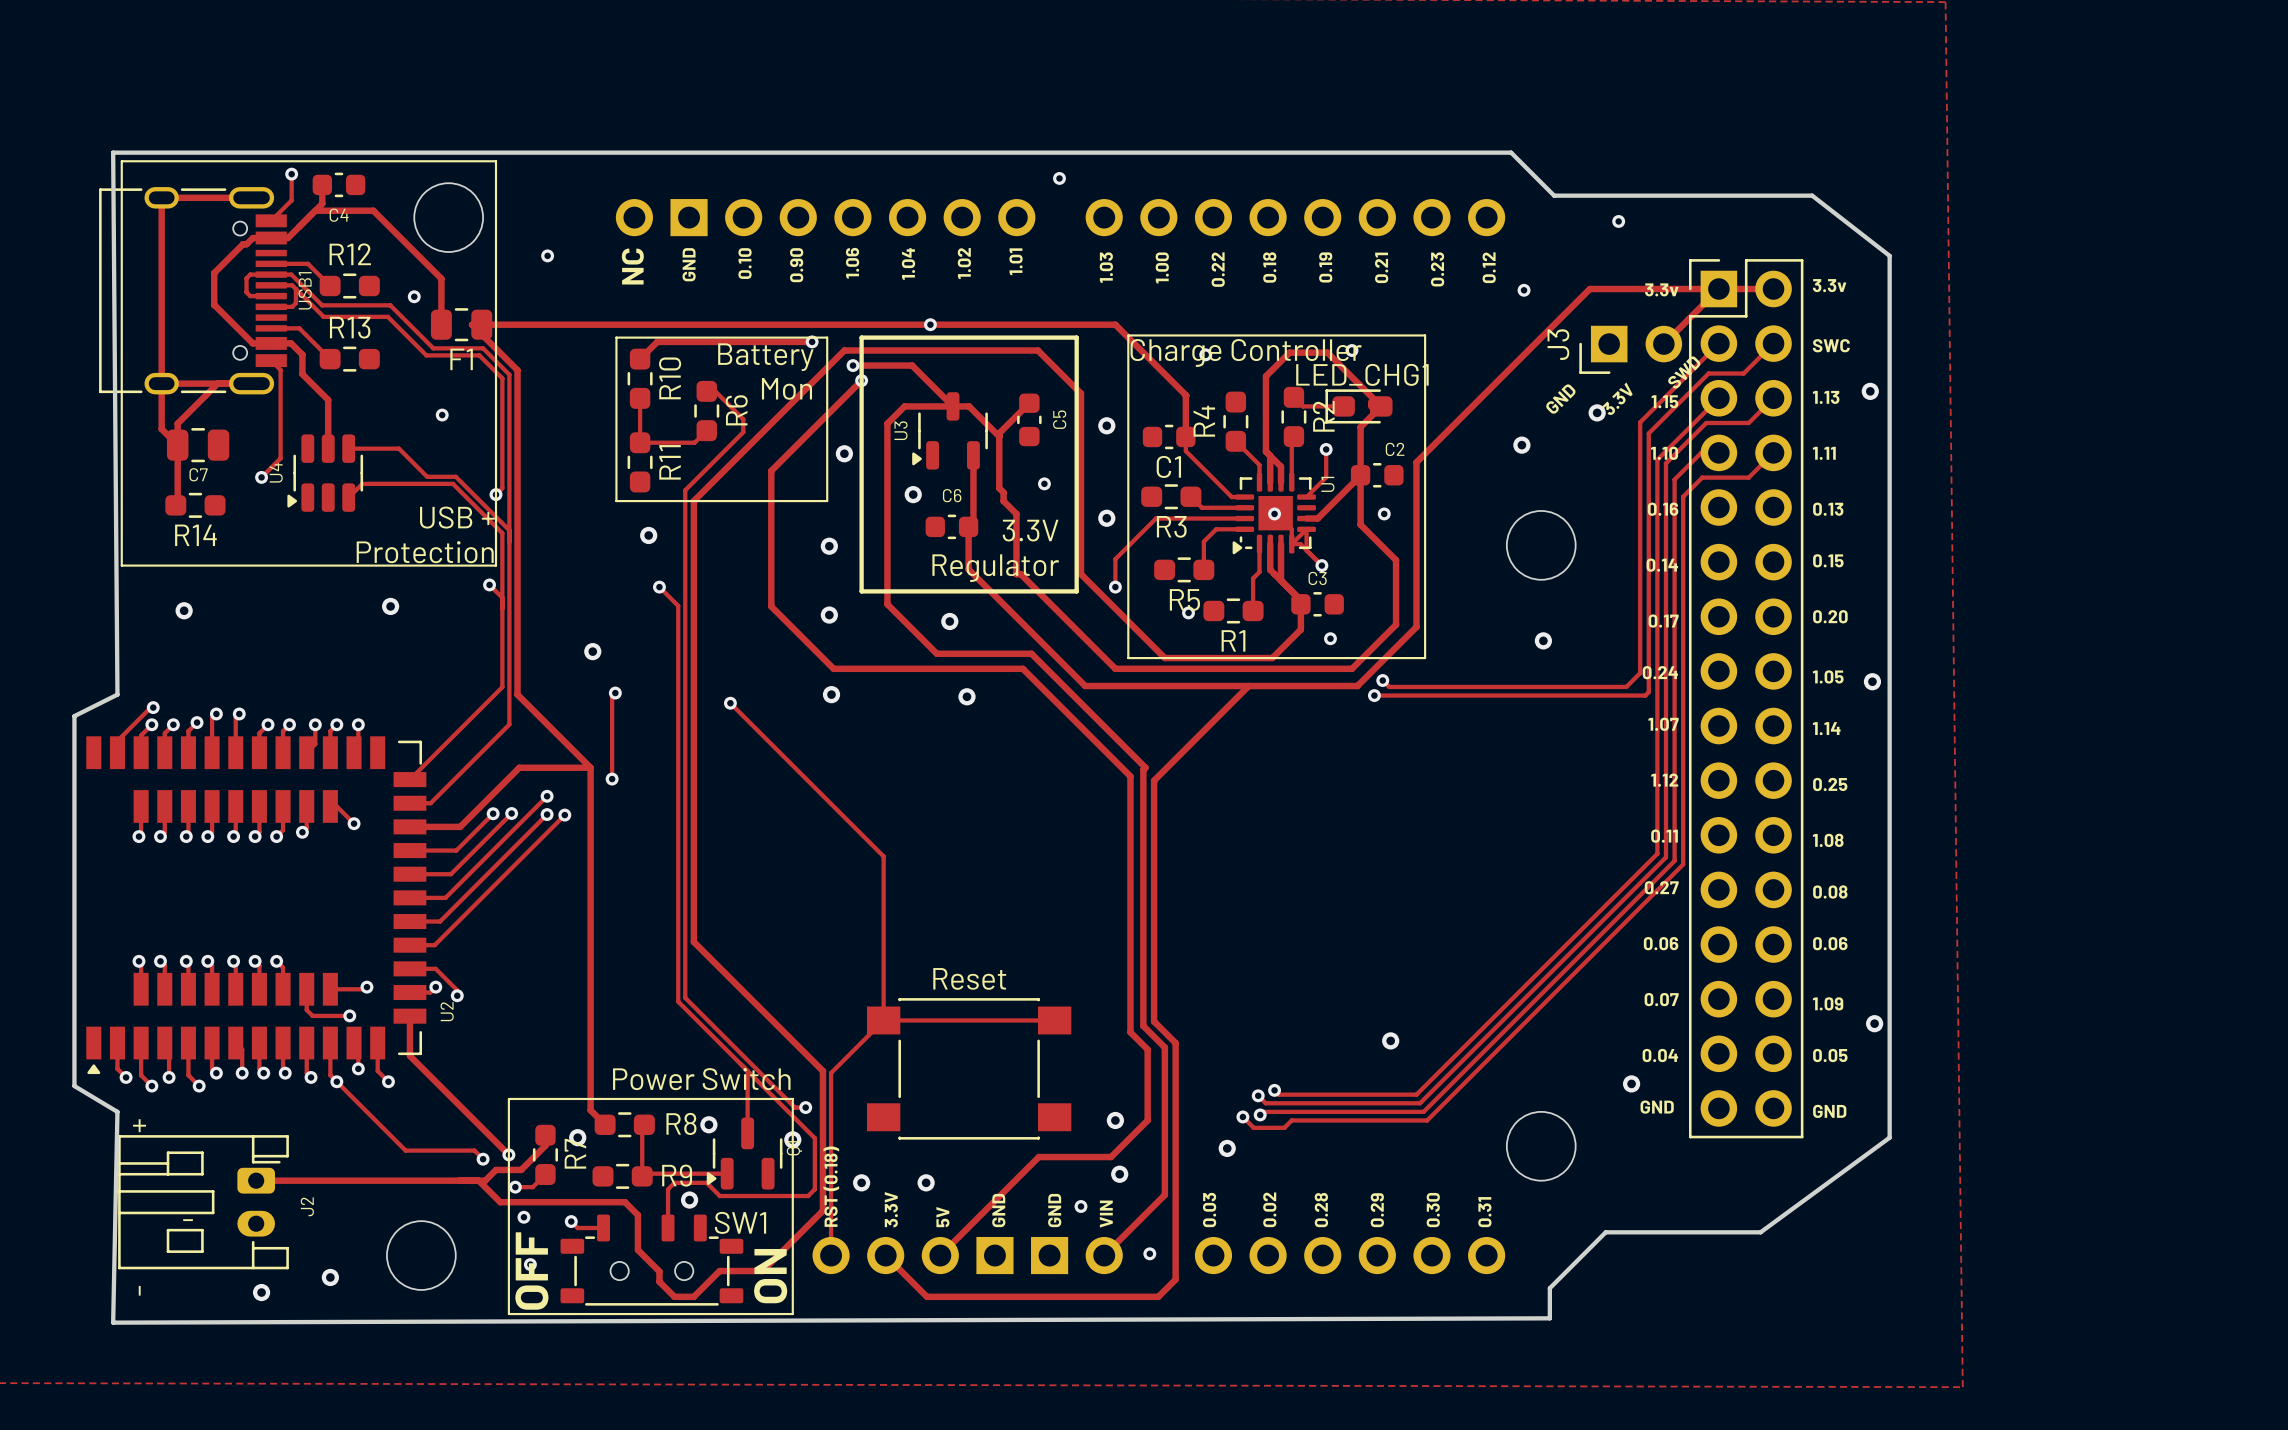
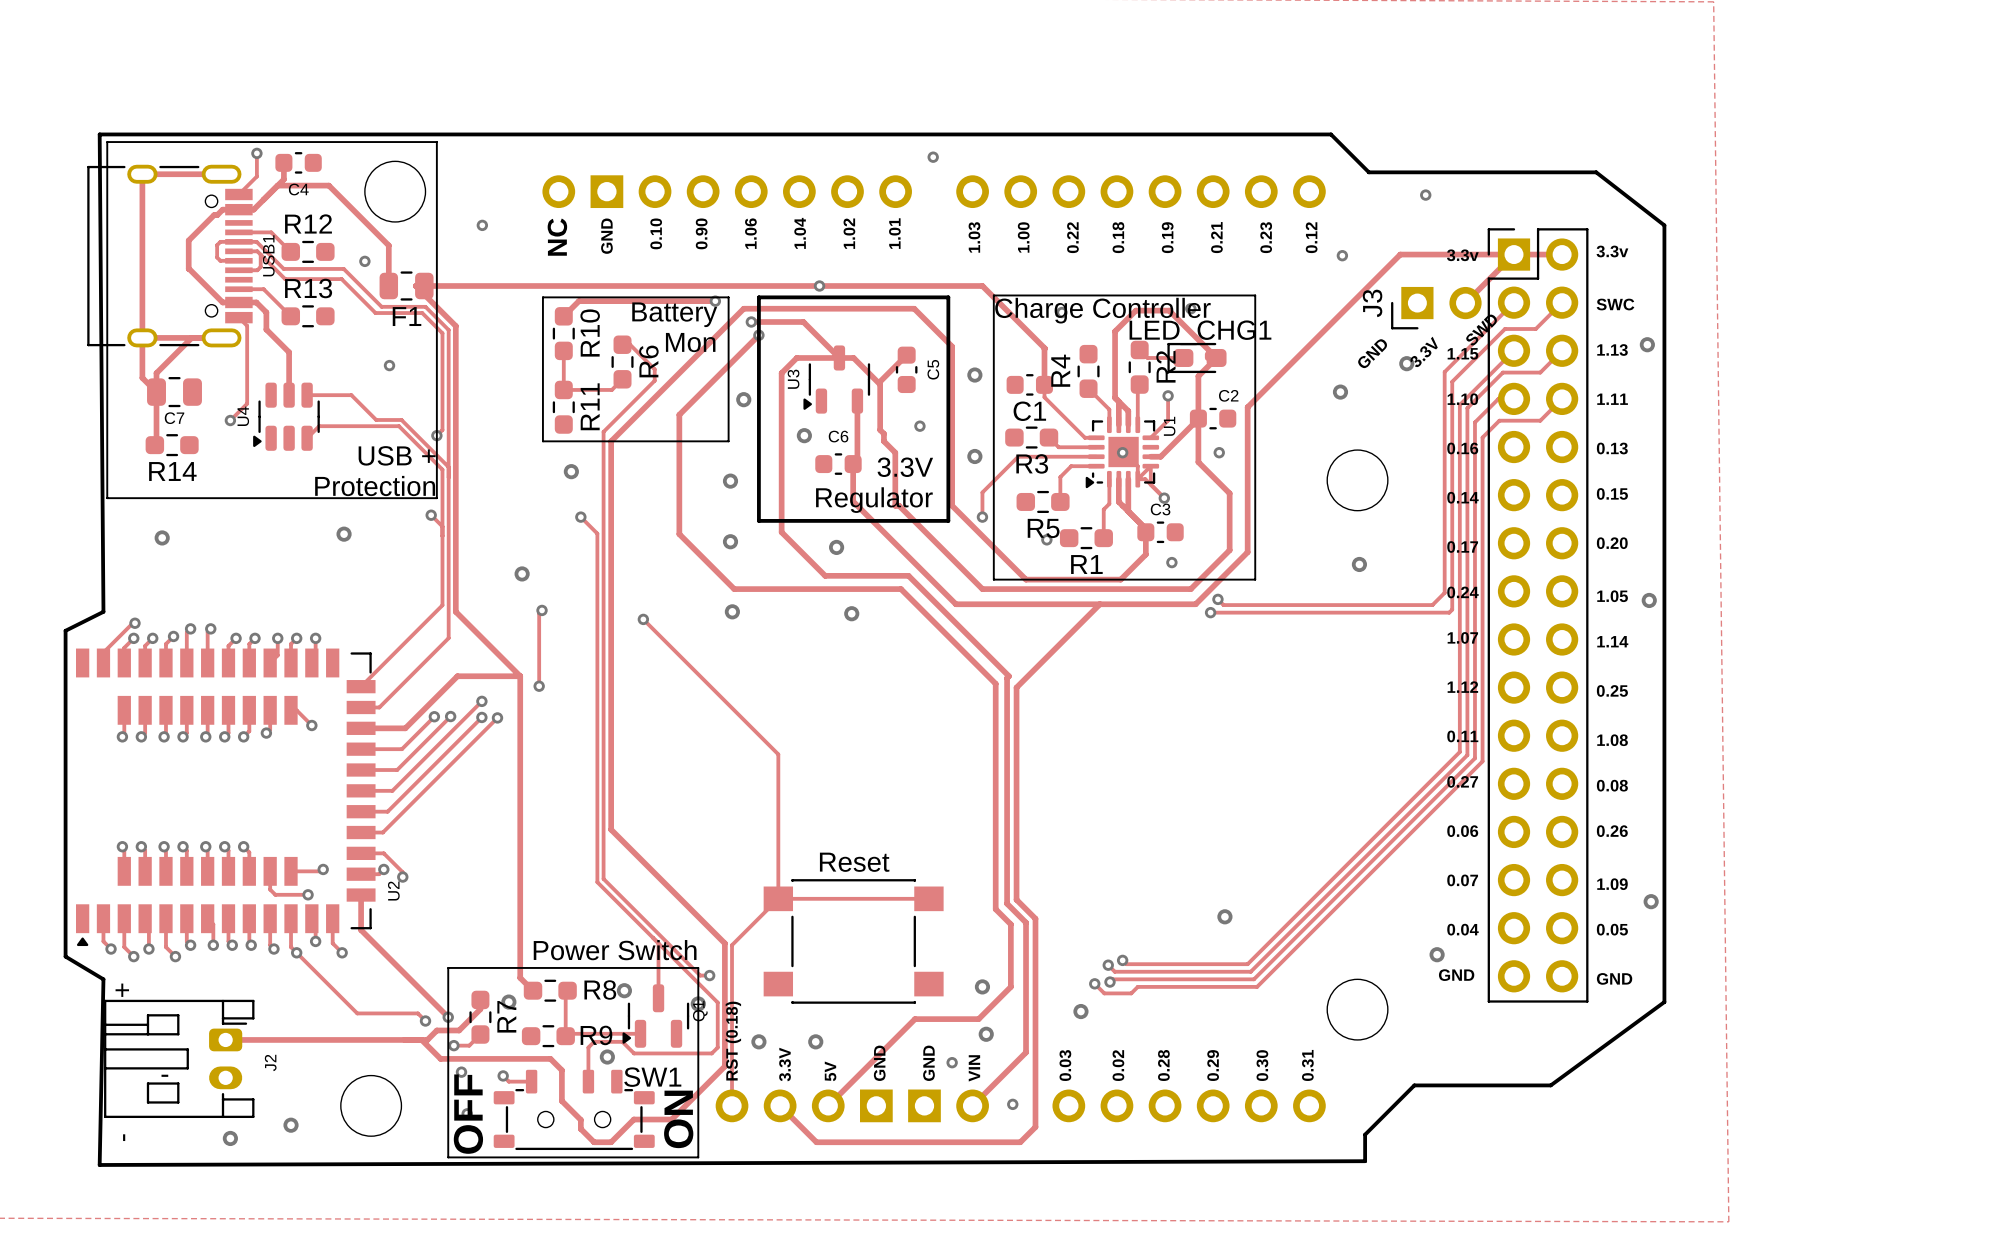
text: 0.06 (1830, 943) -> 0.26 (1612, 831)

